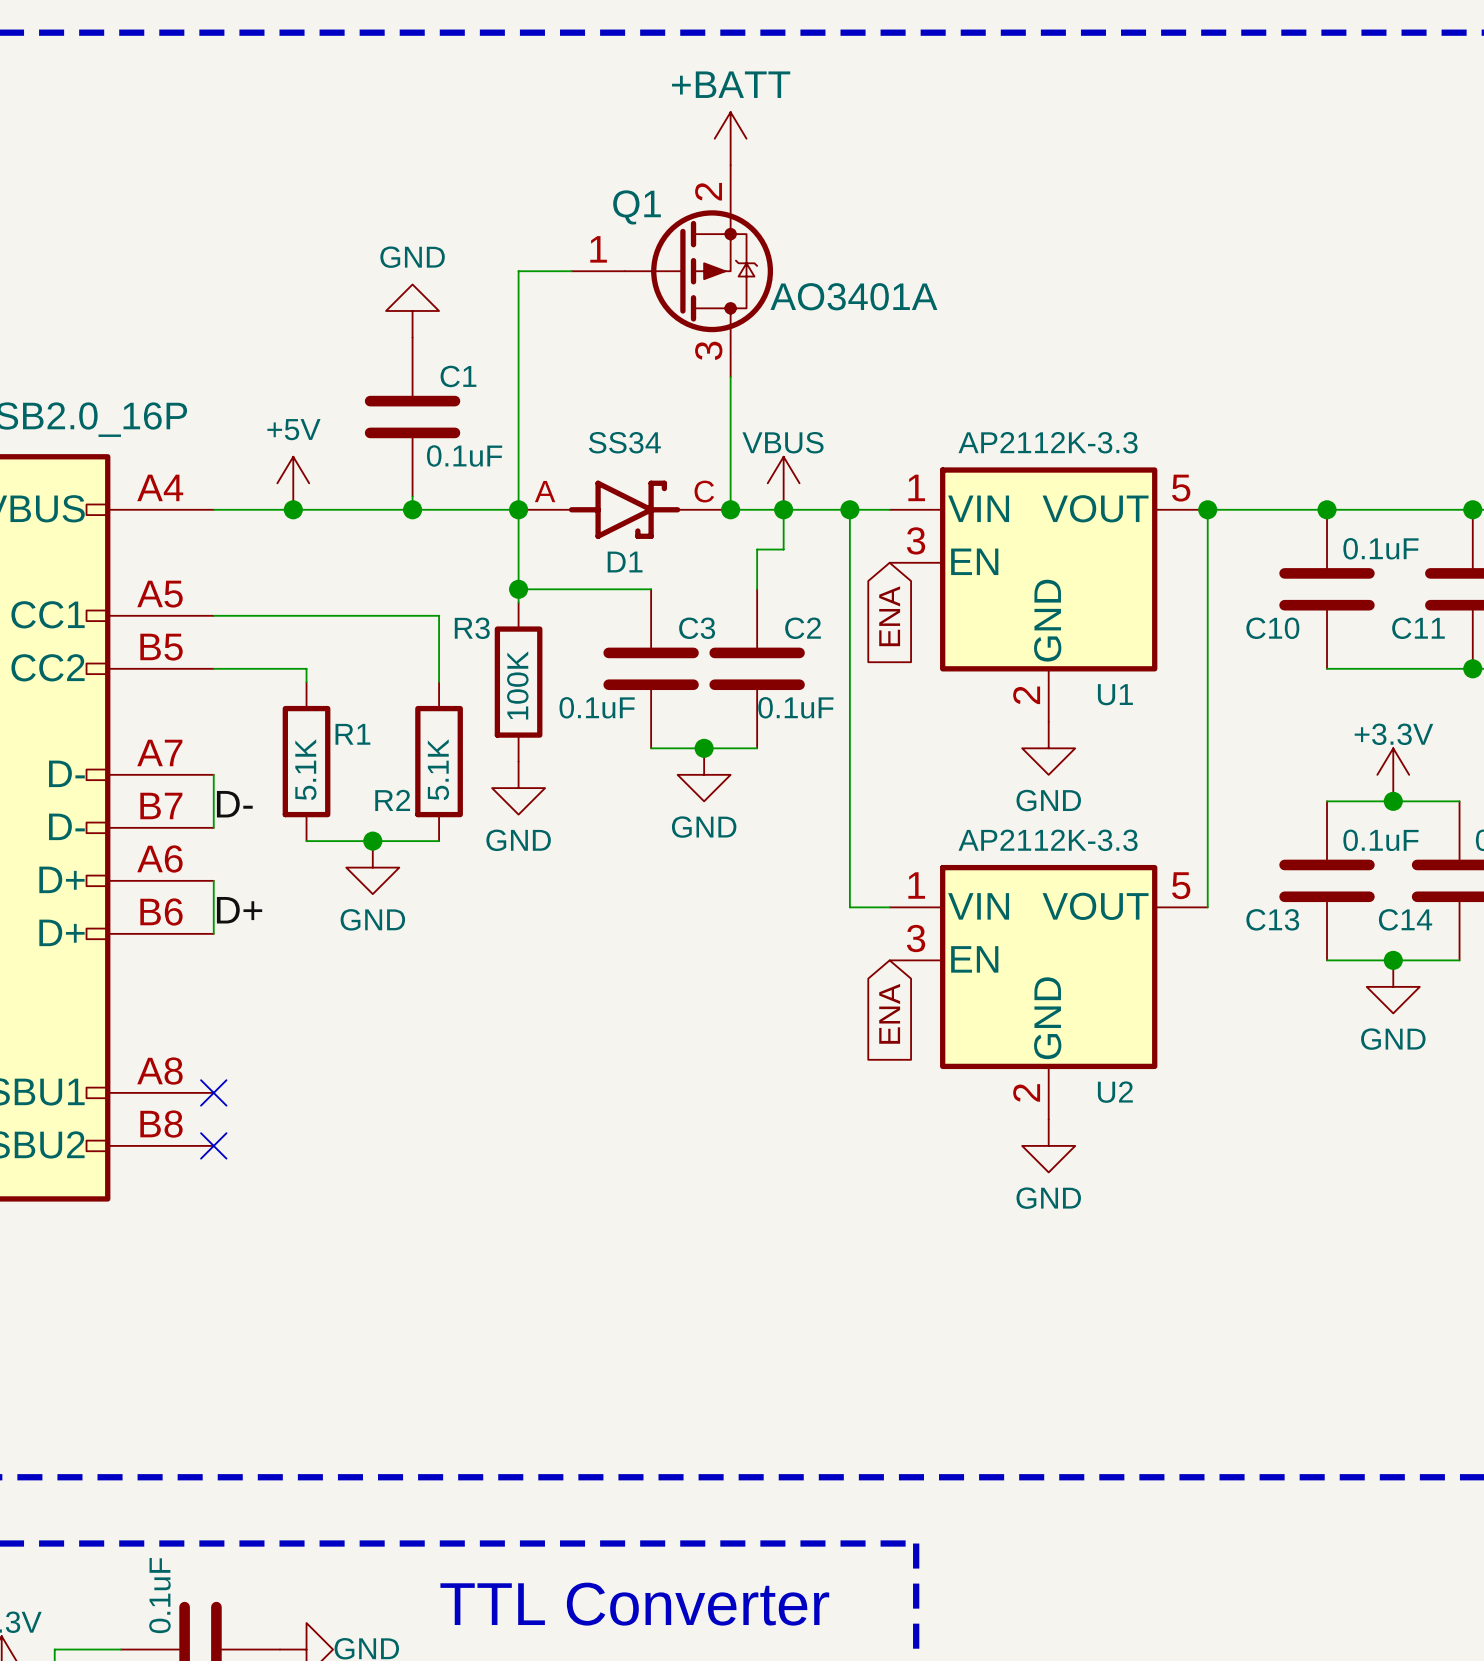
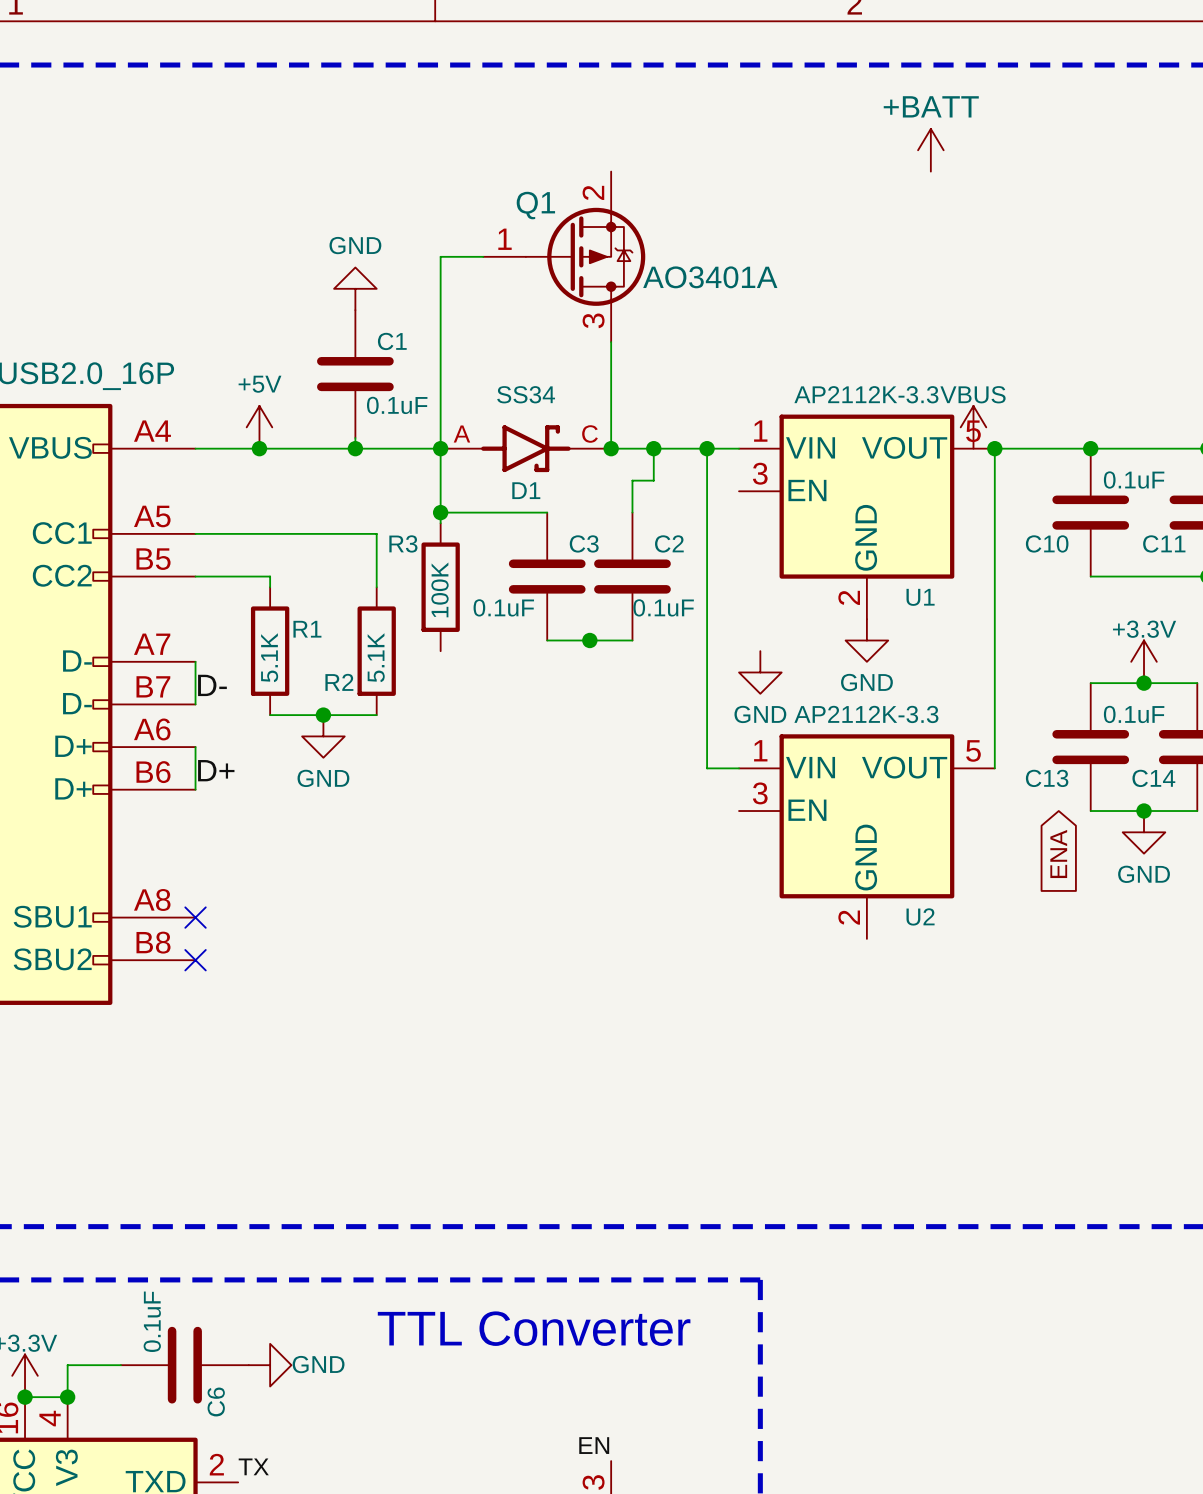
power symbol position: +BATT (730, 138) -> +BATT (930, 150)
power symbol: VBUS (783, 483) -> none
power symbol: none -> VBUS (973, 427)
global label: ENA (889, 616) -> none
power symbol: GND (704, 774) -> none
power symbol: GND (518, 788) -> none
power symbol: none -> GND (760, 672)
global label: ENA (889, 1013) -> none
global label: none -> ENA (1058, 853)
power symbol: GND (1048, 1145) -> none

